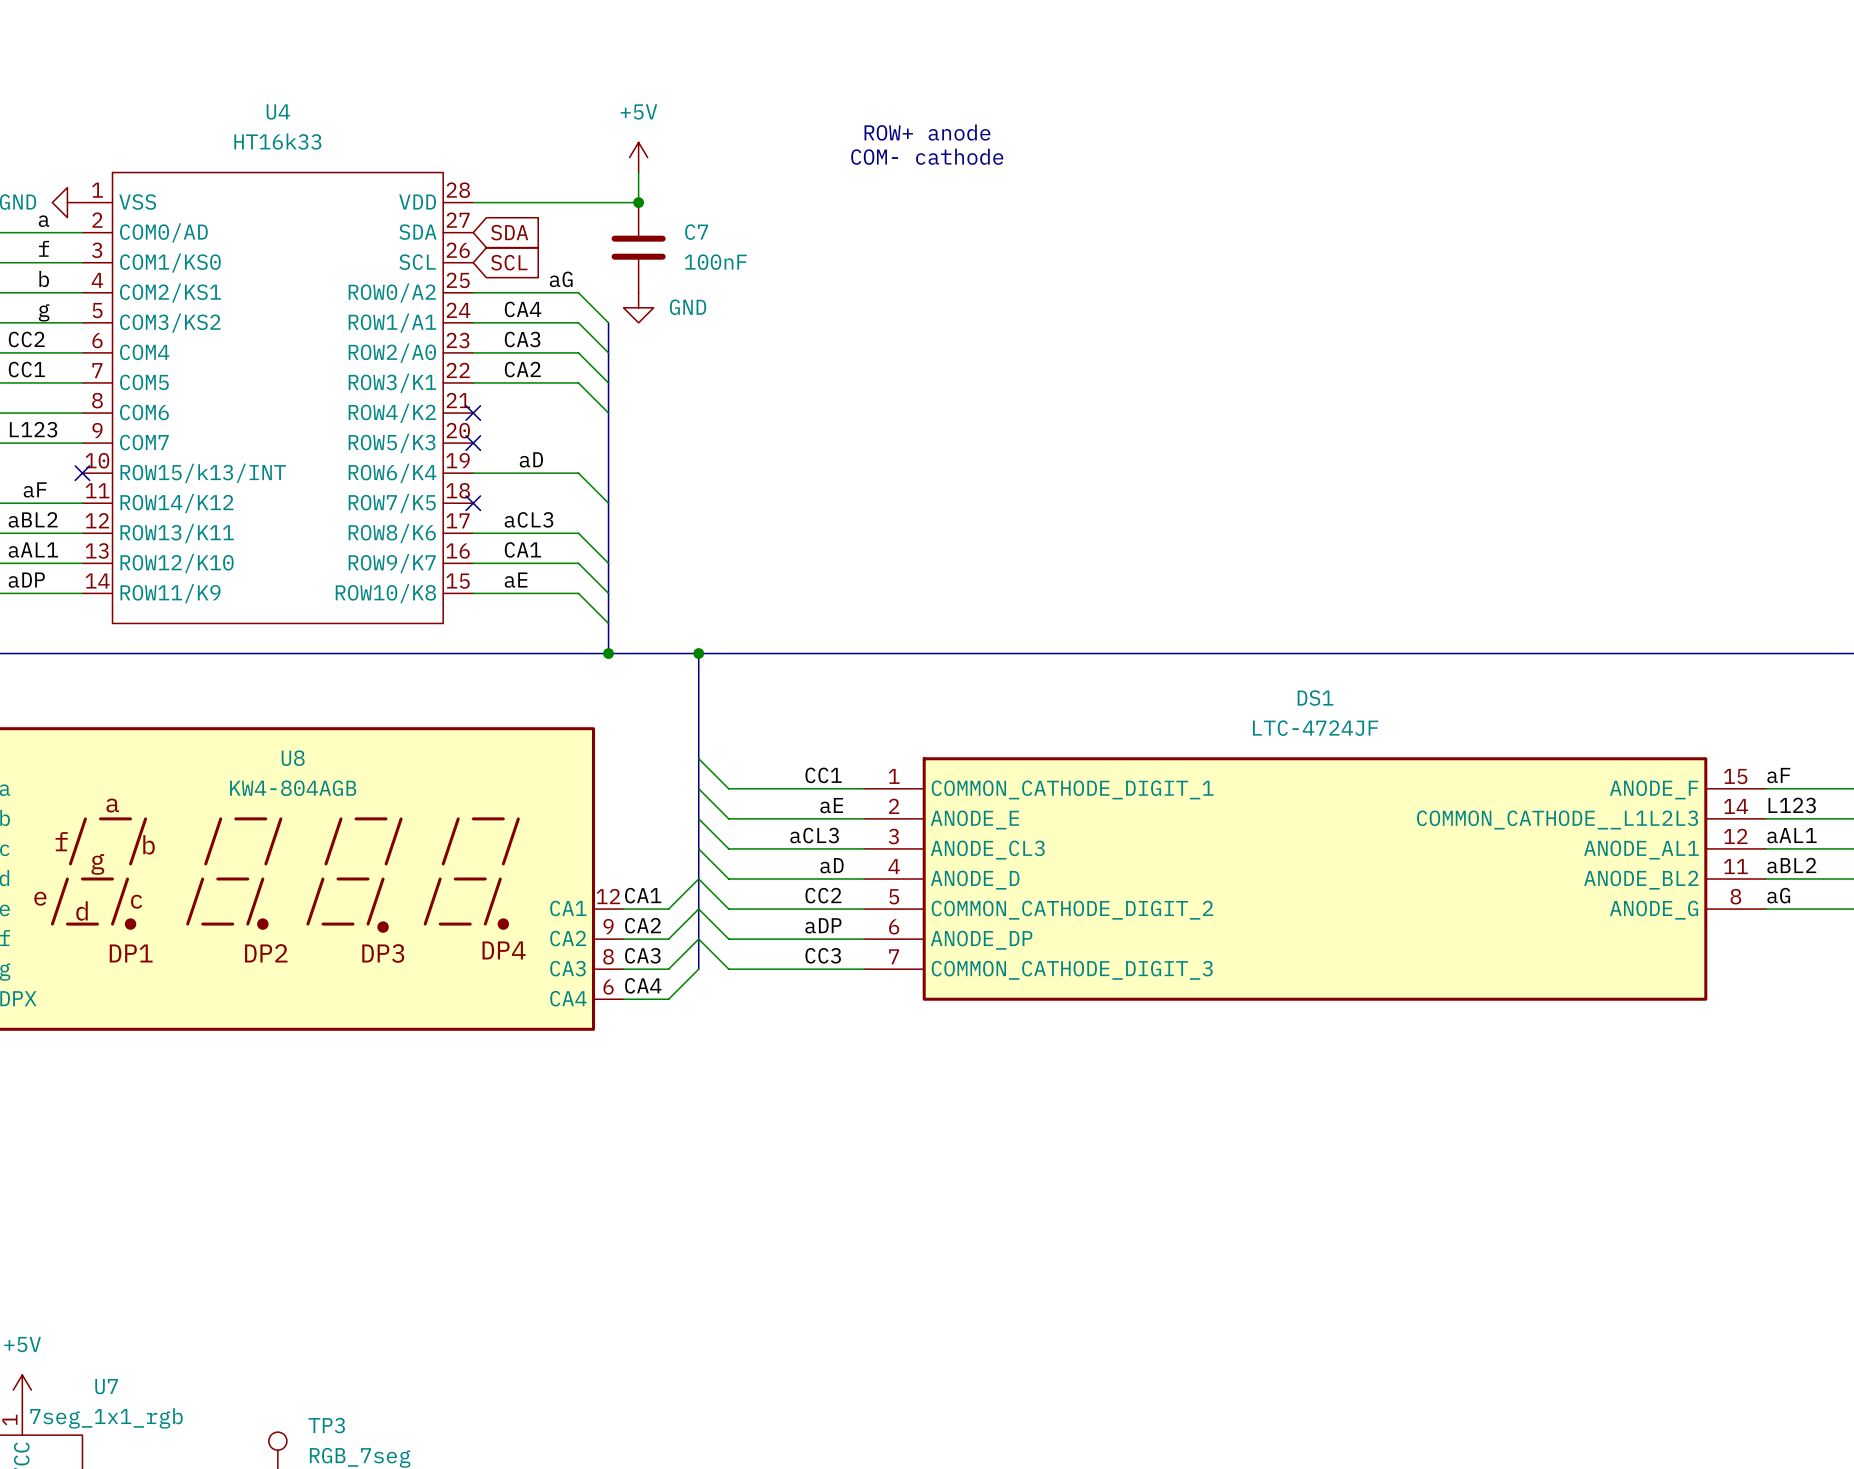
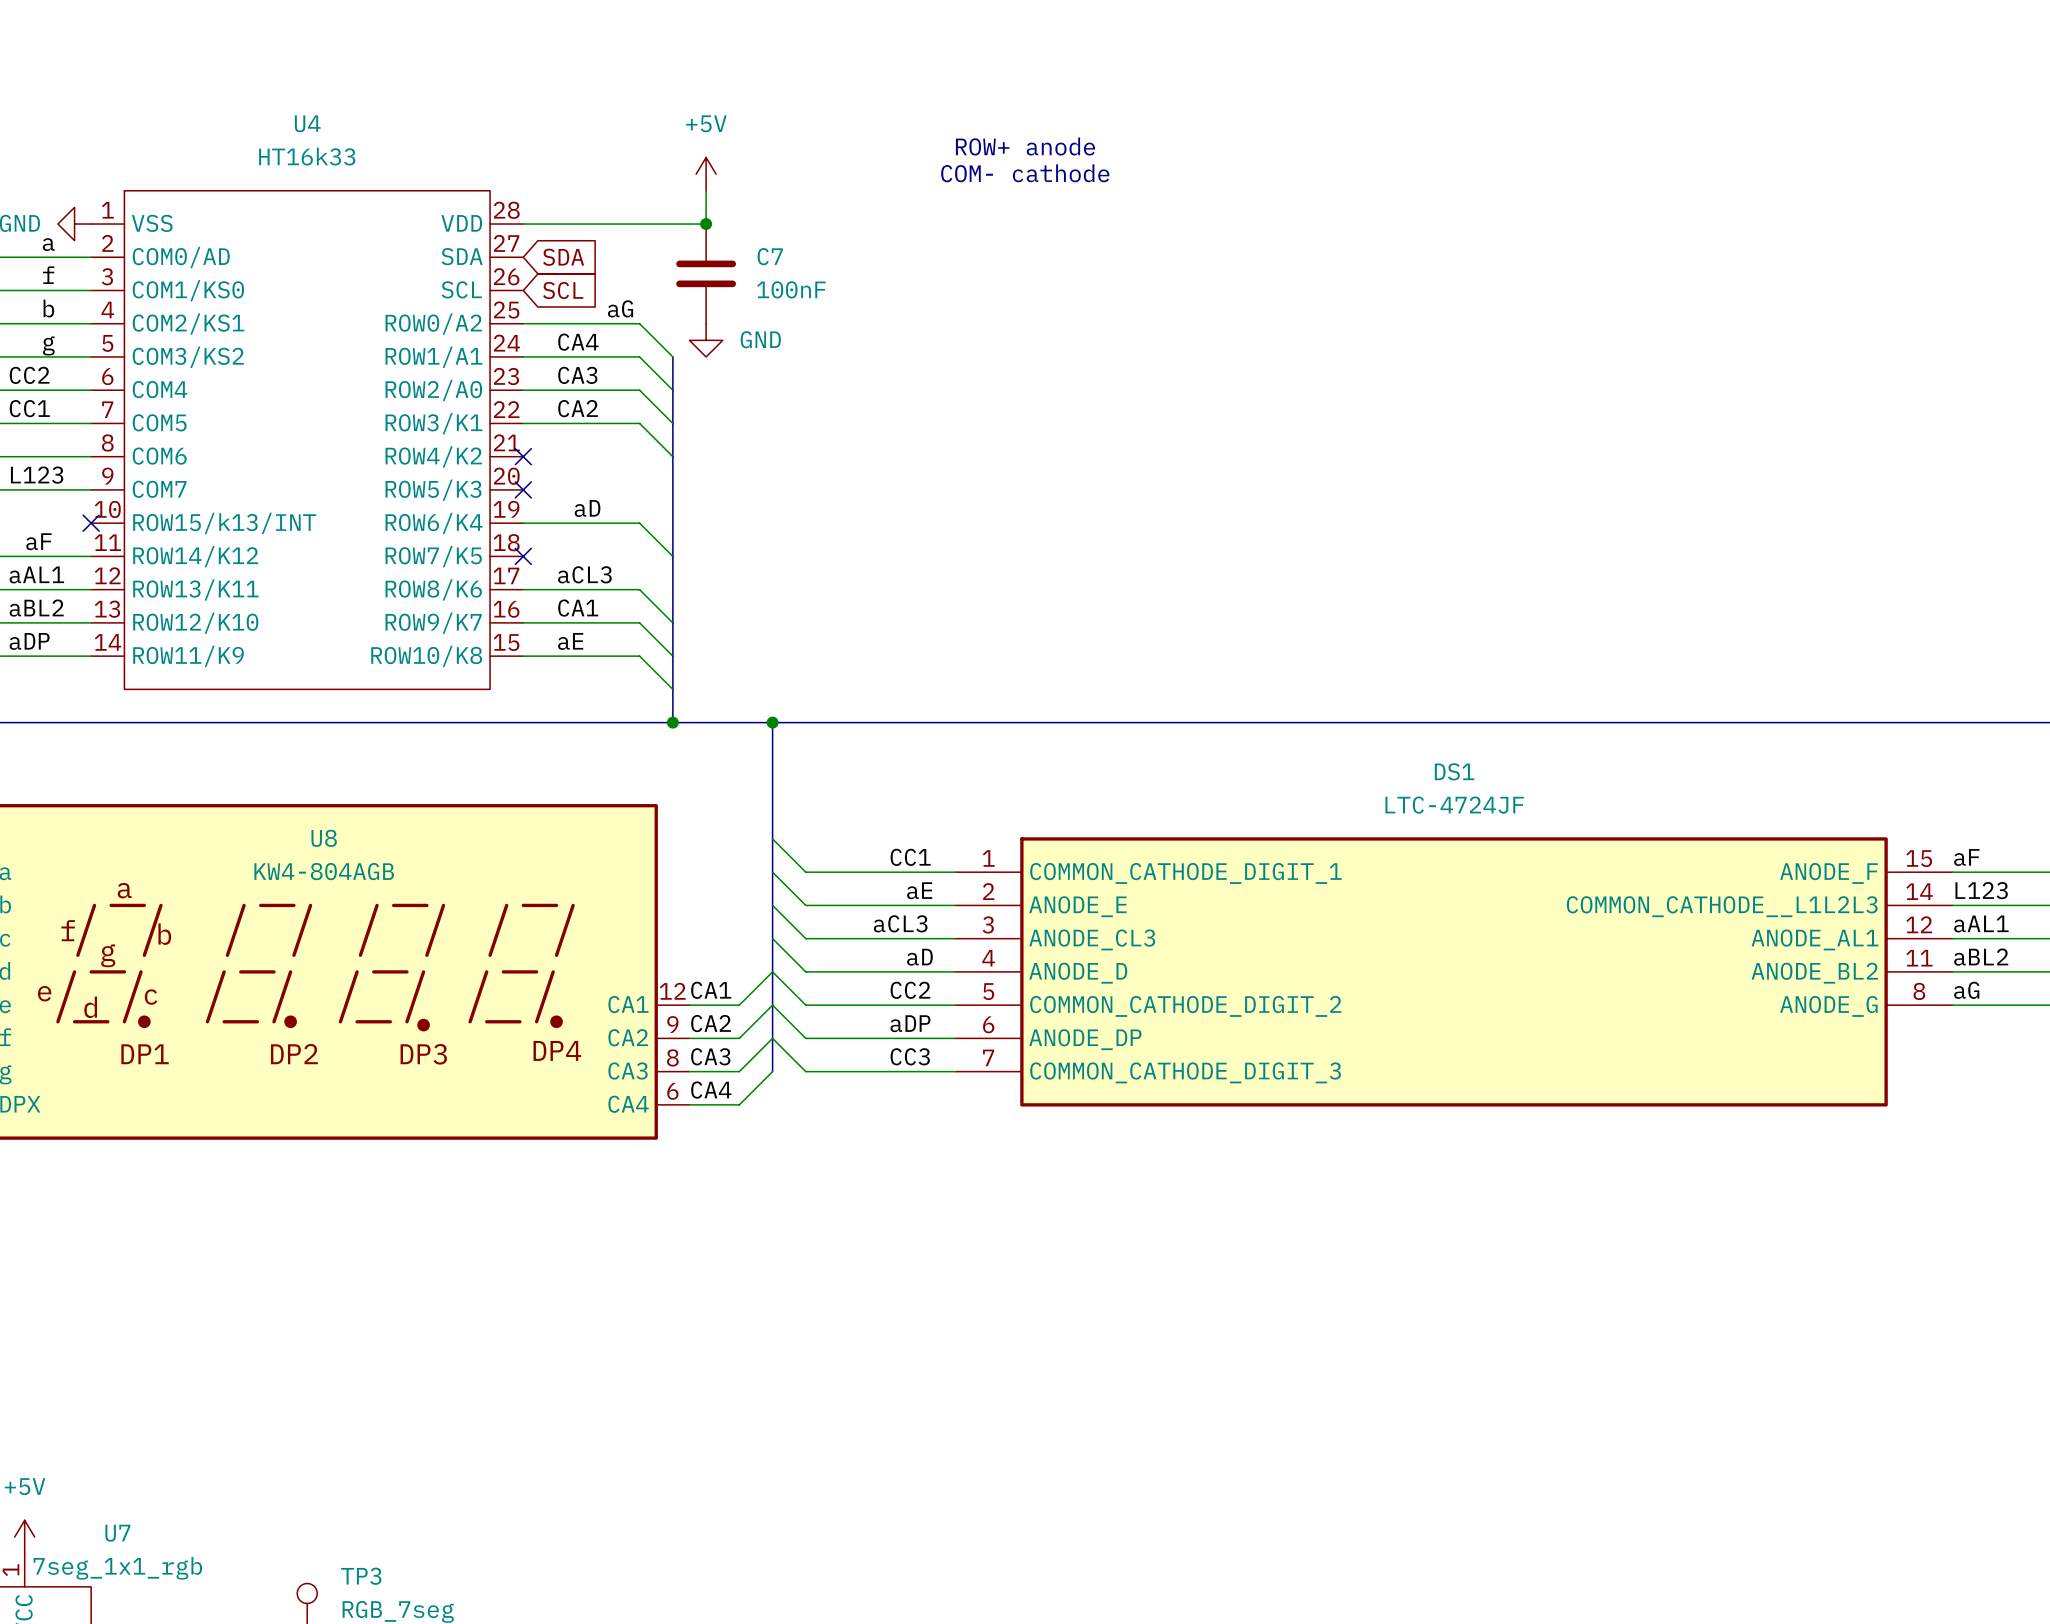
label: aBL2 (33, 519) -> aAL1 (36, 574)
label: aAL1 (33, 550) -> aBL2 (36, 608)

